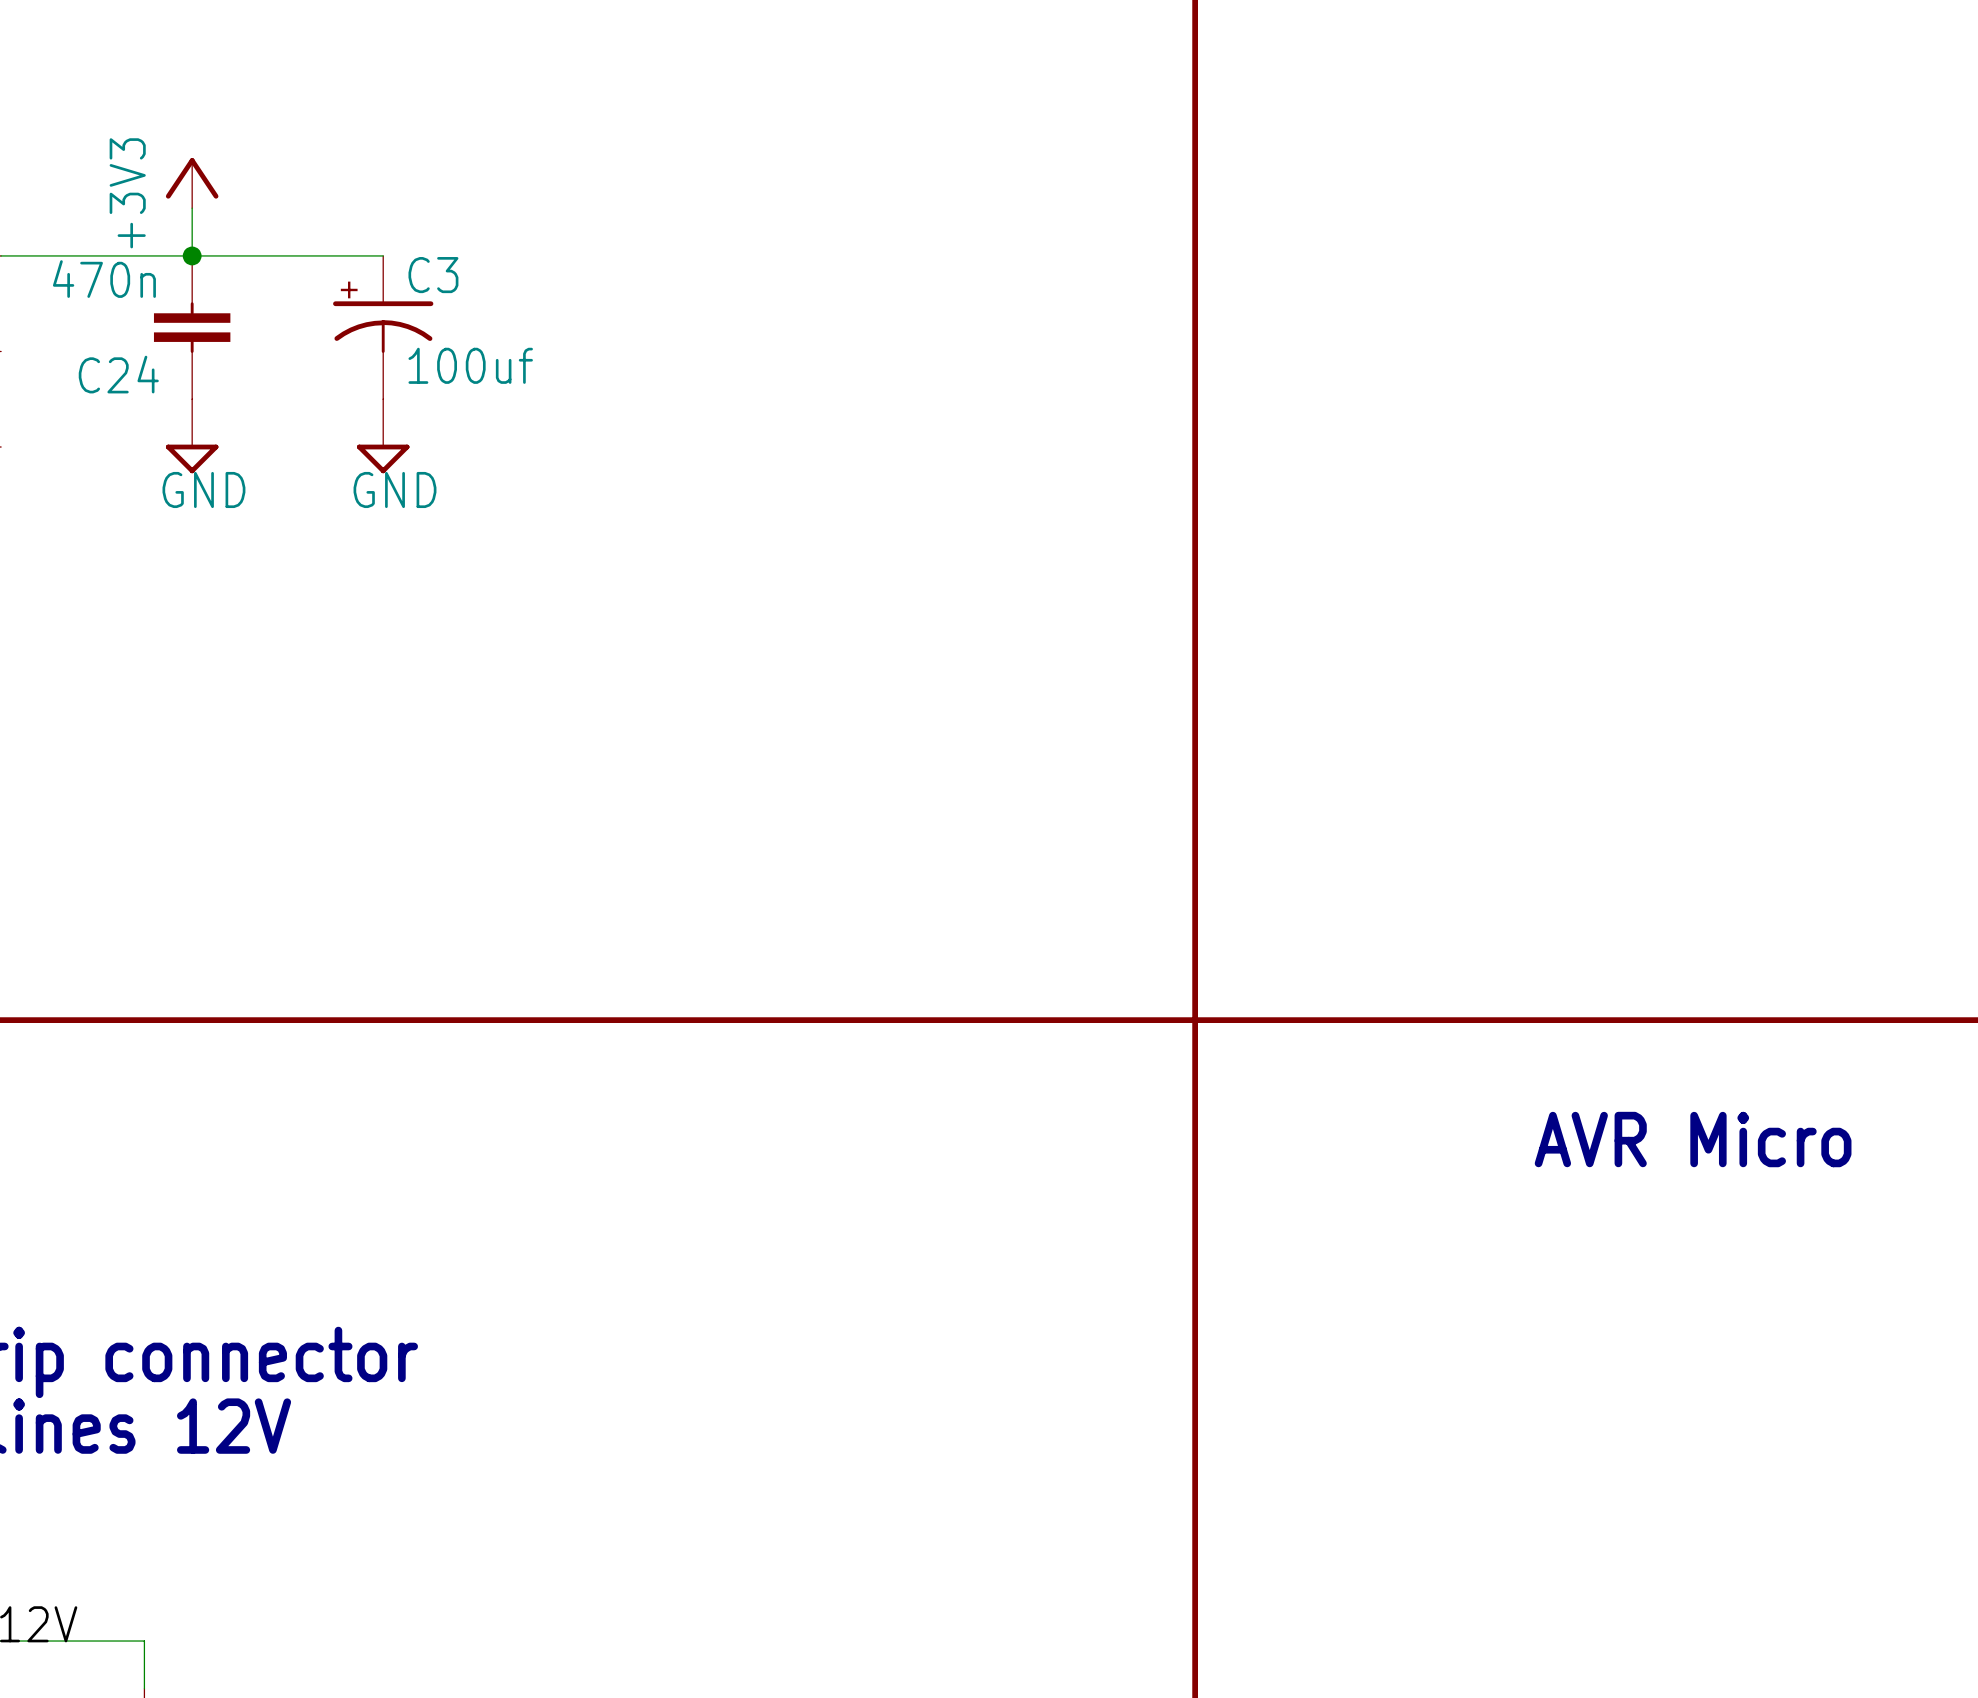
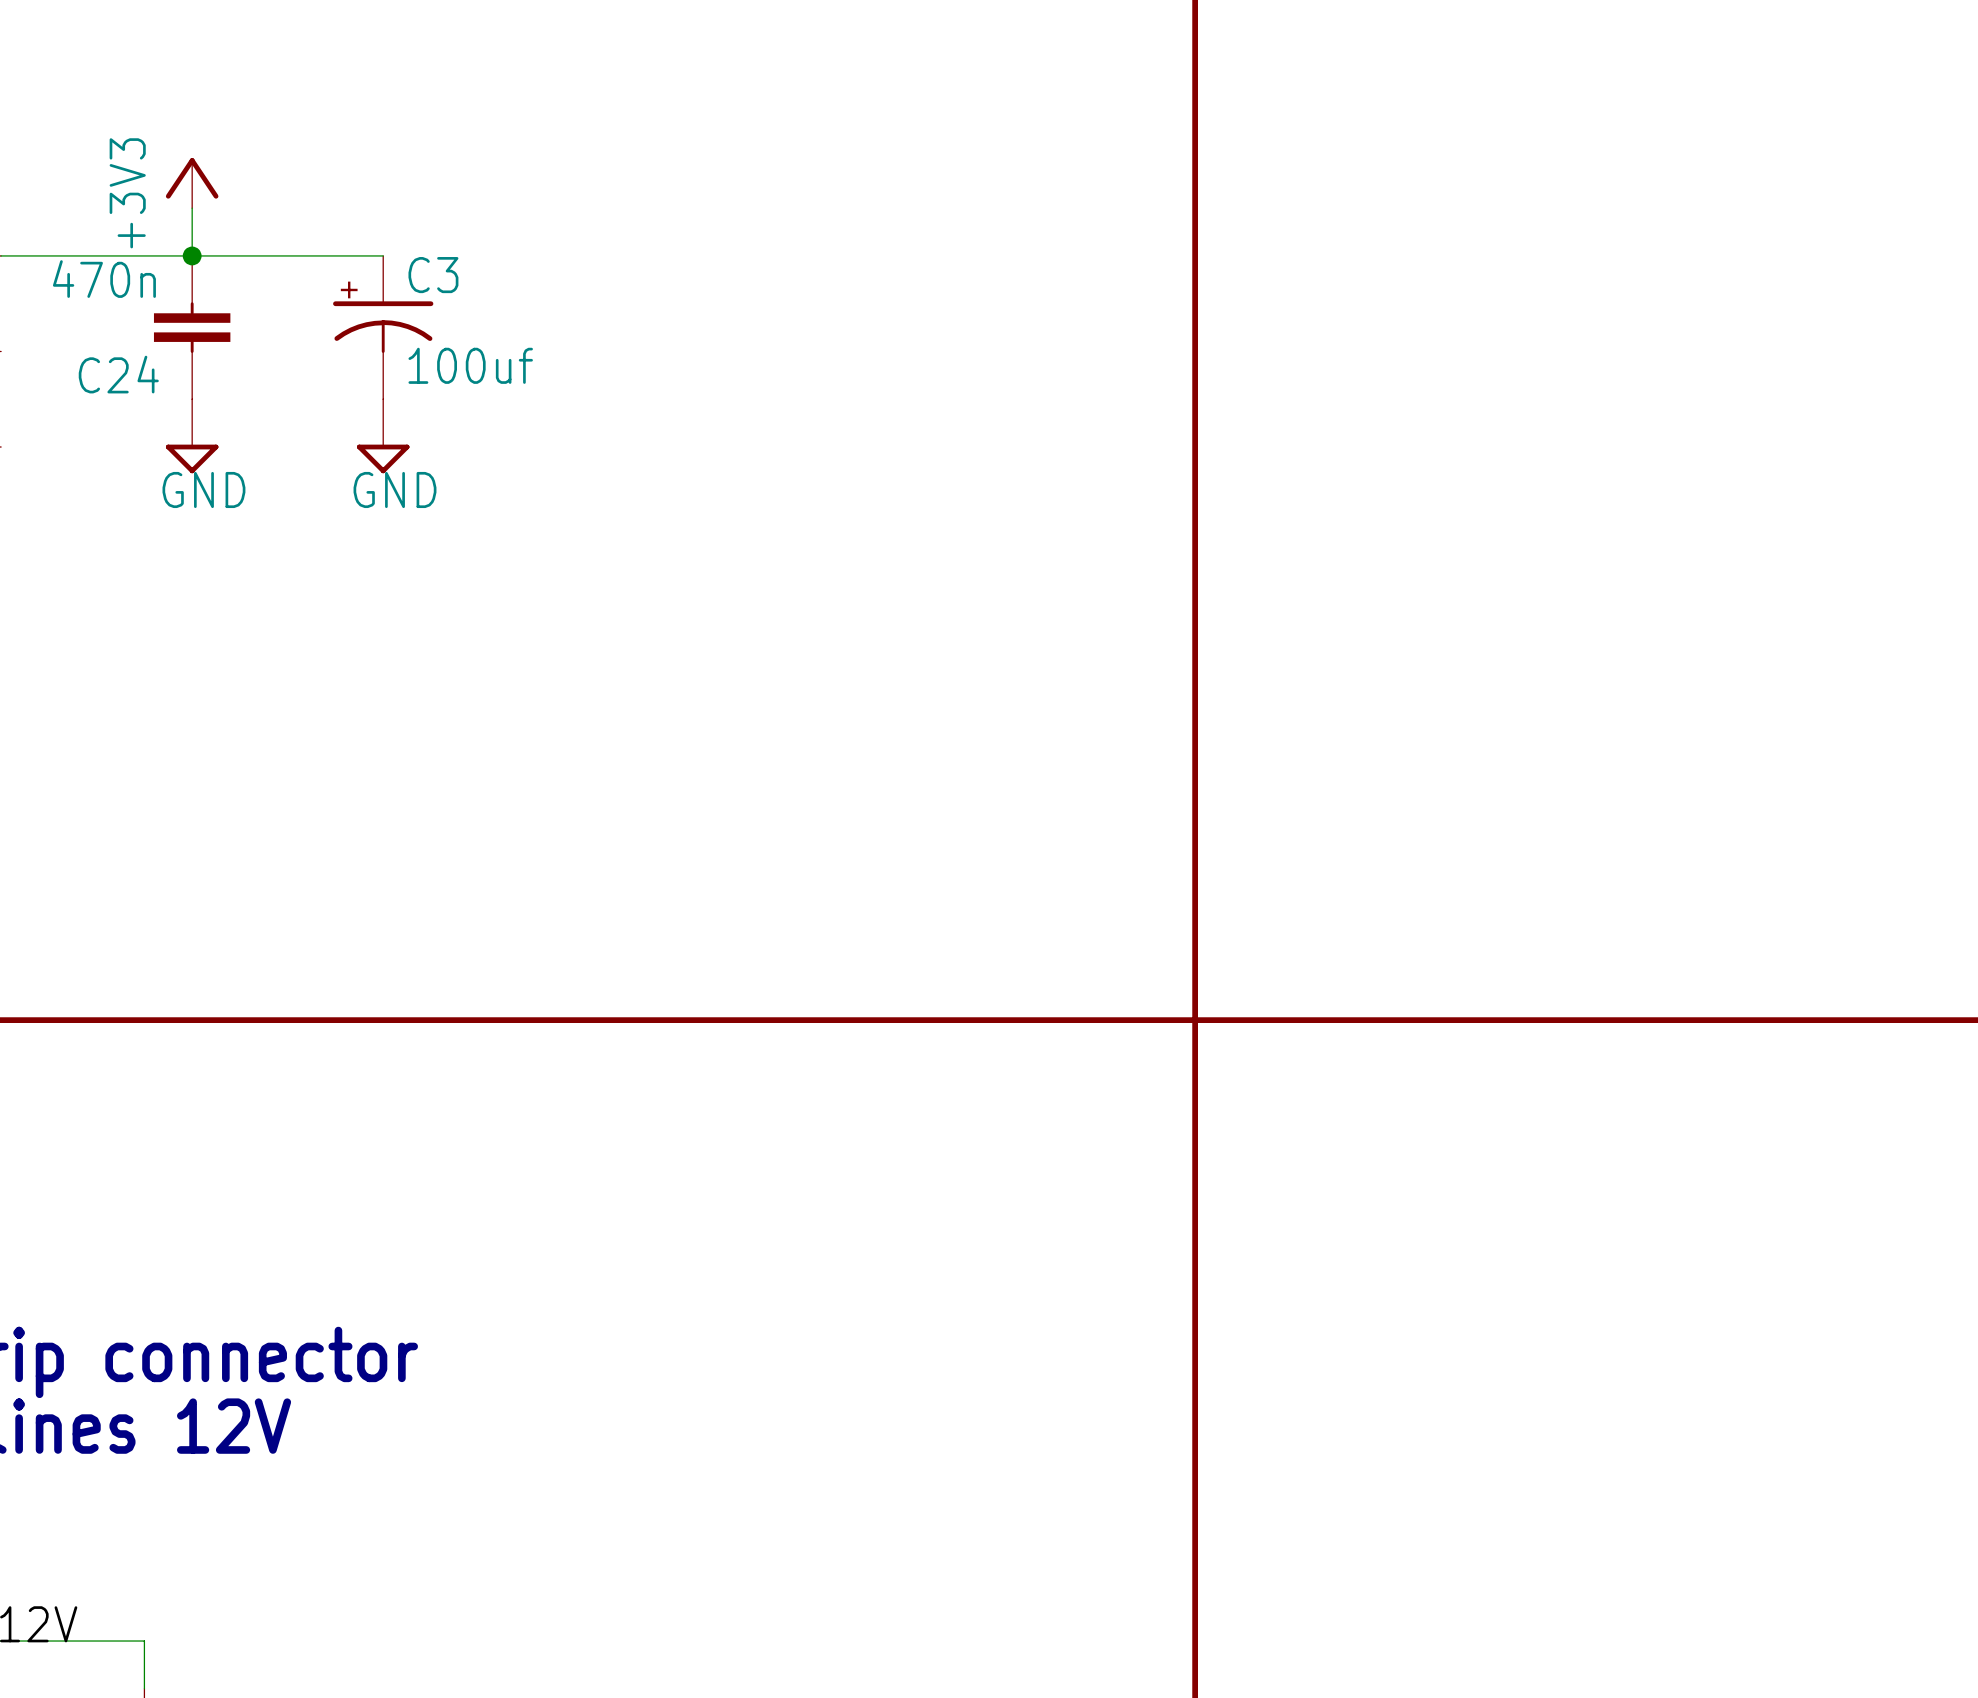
text: AVR Micro (1693, 1139) -> none

